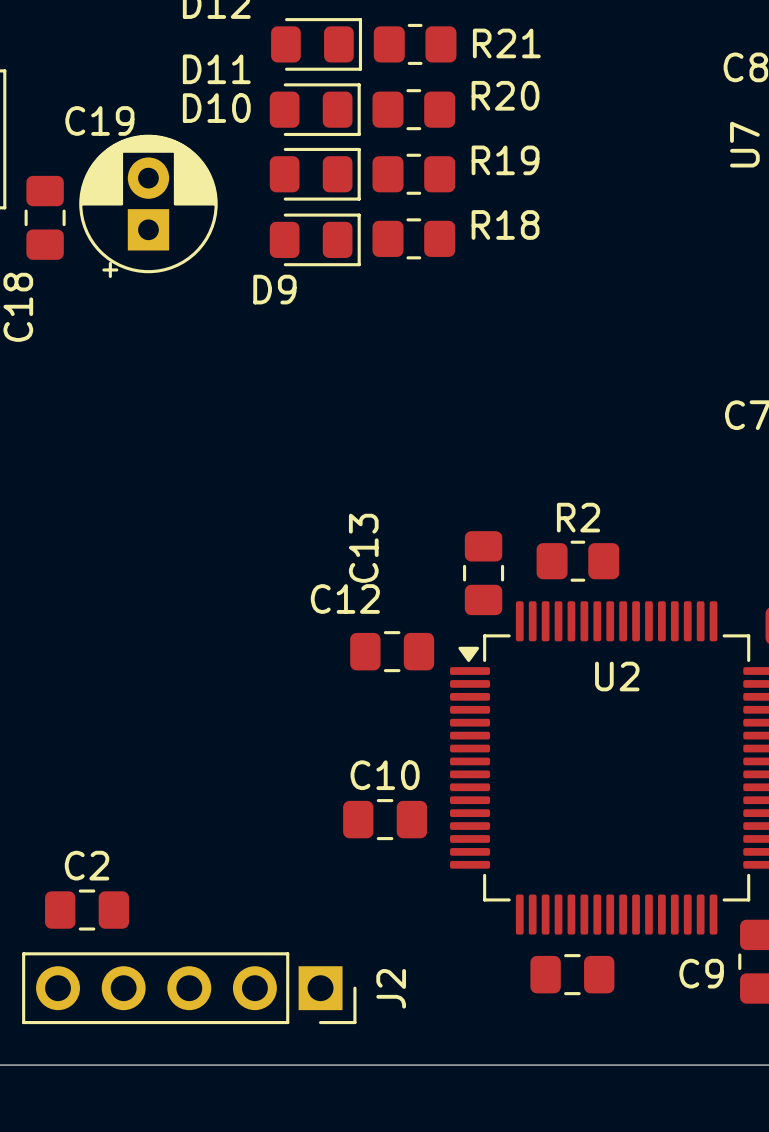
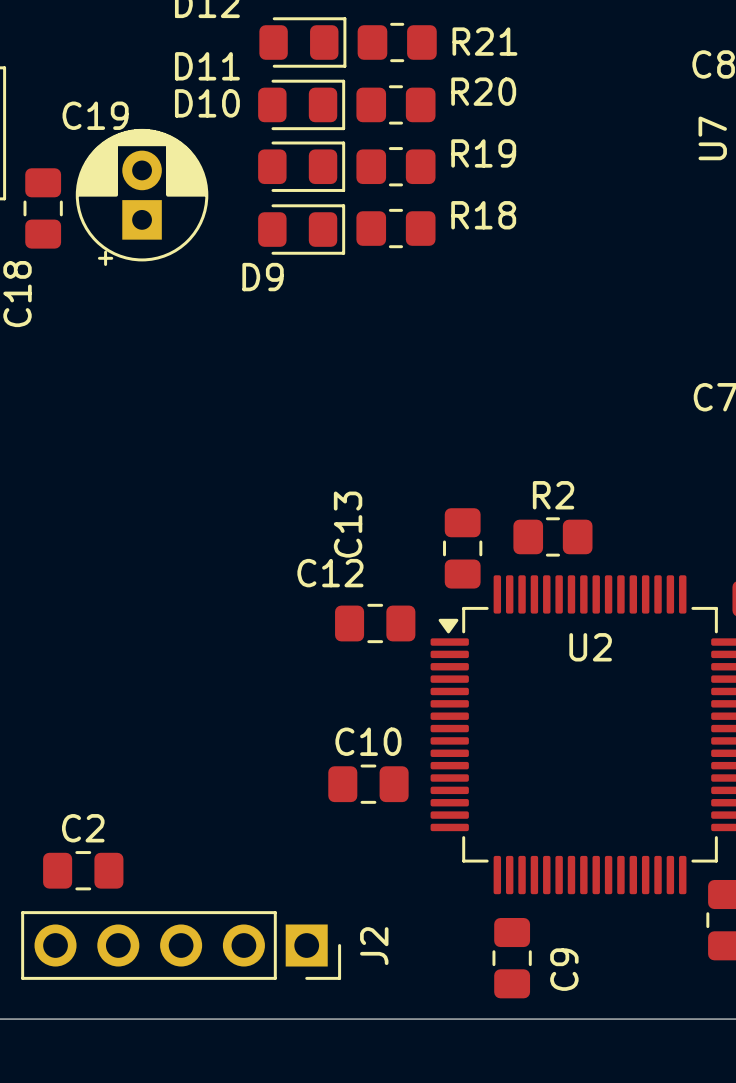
C9 name position: C9 (701, 973) -> C9 (564, 969)
C9 rotation: 0° (572, 974) -> 90° clockwise (512, 958)

